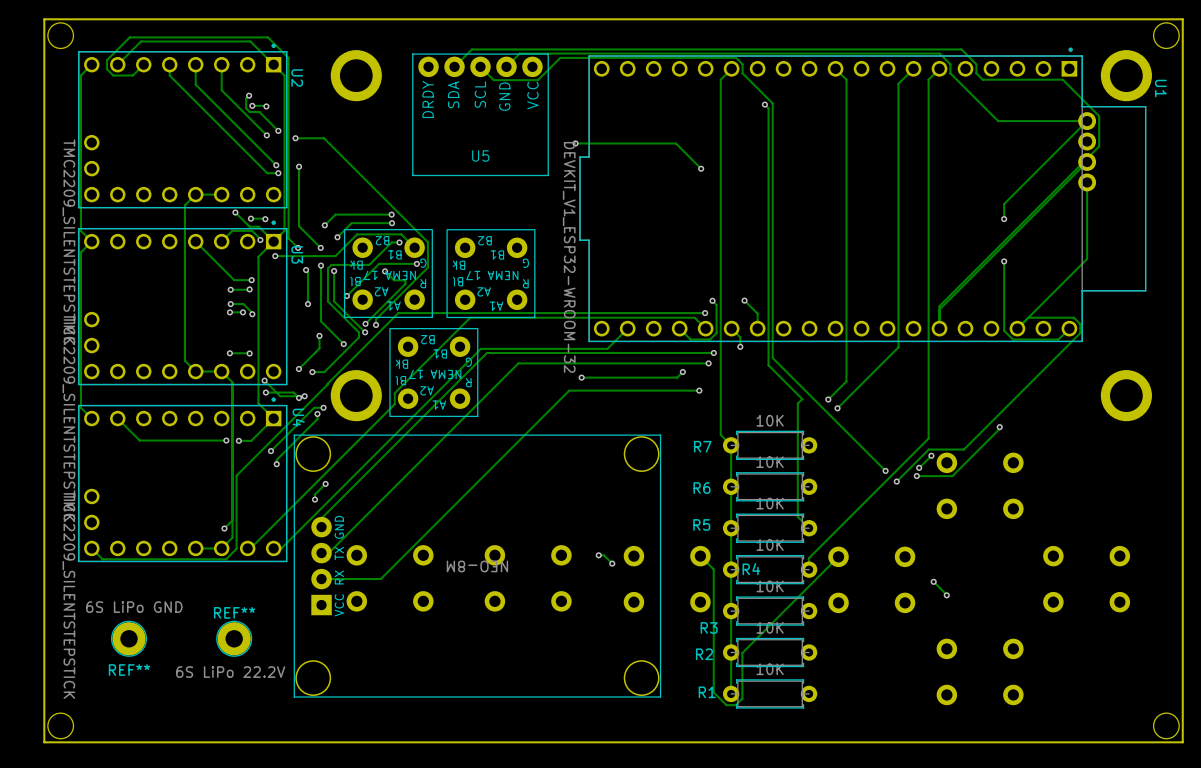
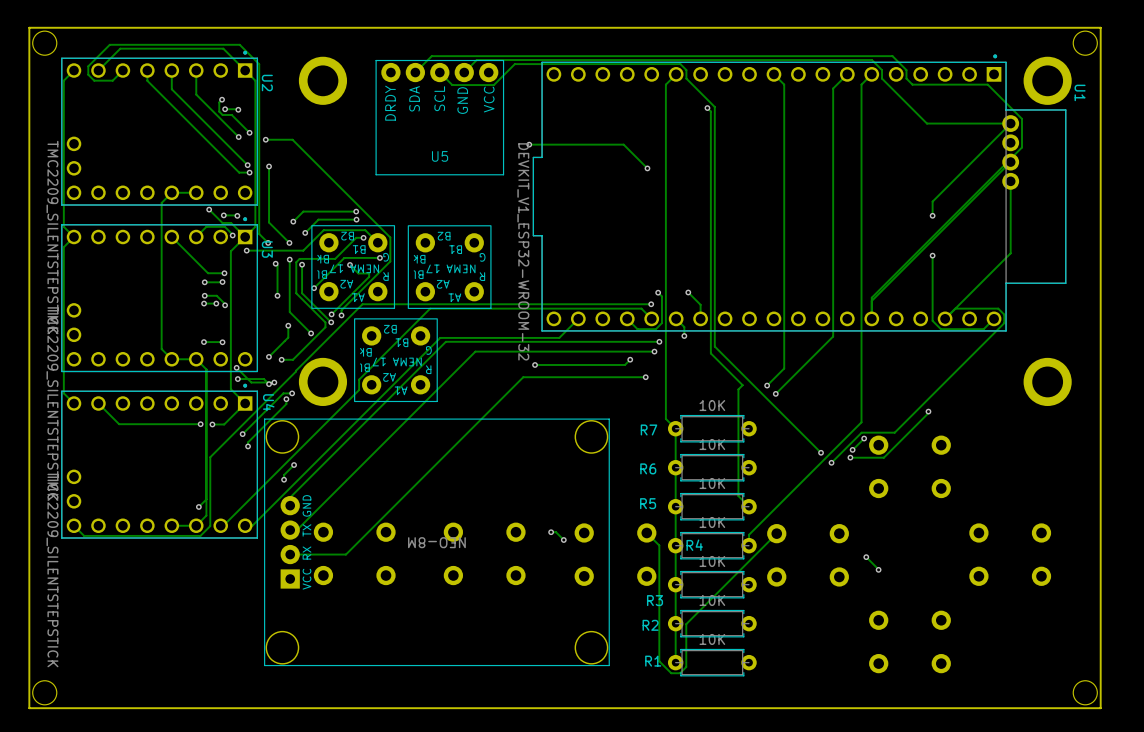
REF**: 6S LiPo GND (129, 638) -> none
REF**: 6S LiPo 22.2V (234, 638) -> none

